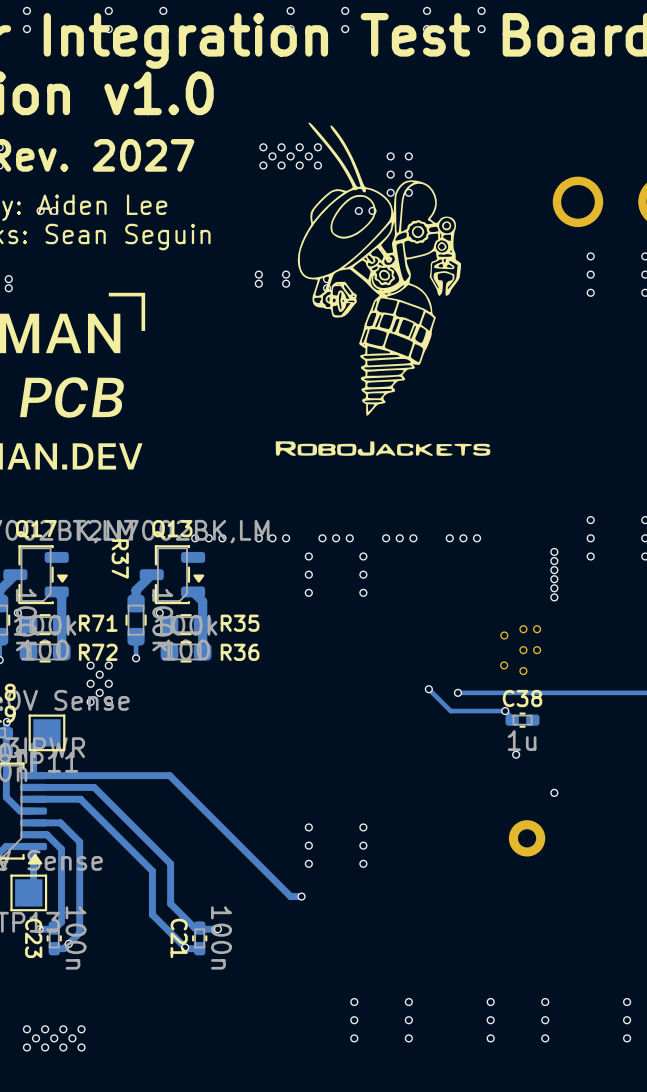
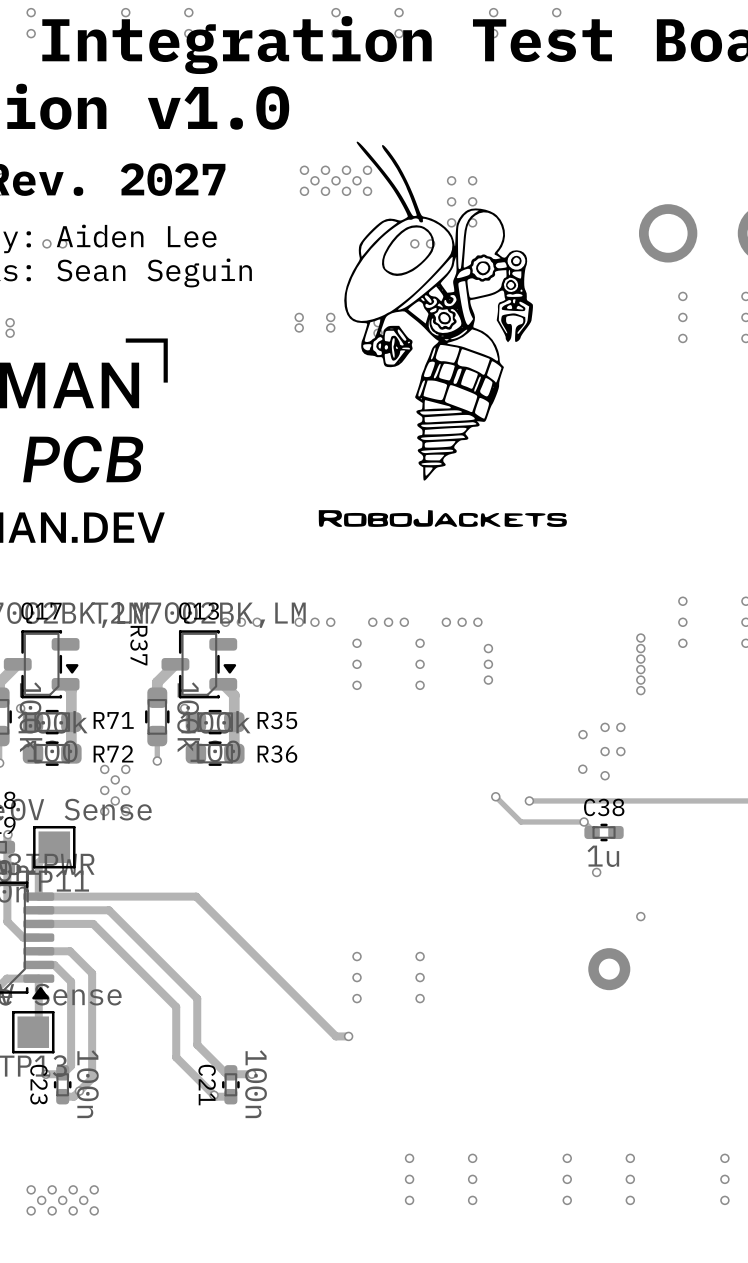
via: (449, 538) -> none
via: (463, 538) -> none
via: (477, 538) -> none
via: none -> (488, 648)
via: none -> (488, 664)
via: none -> (488, 680)

